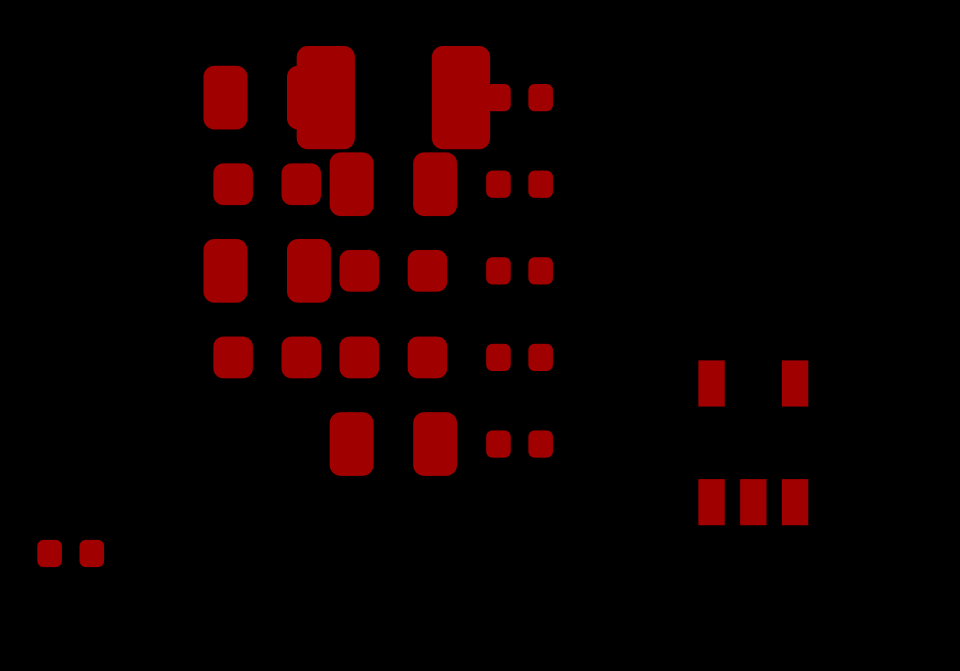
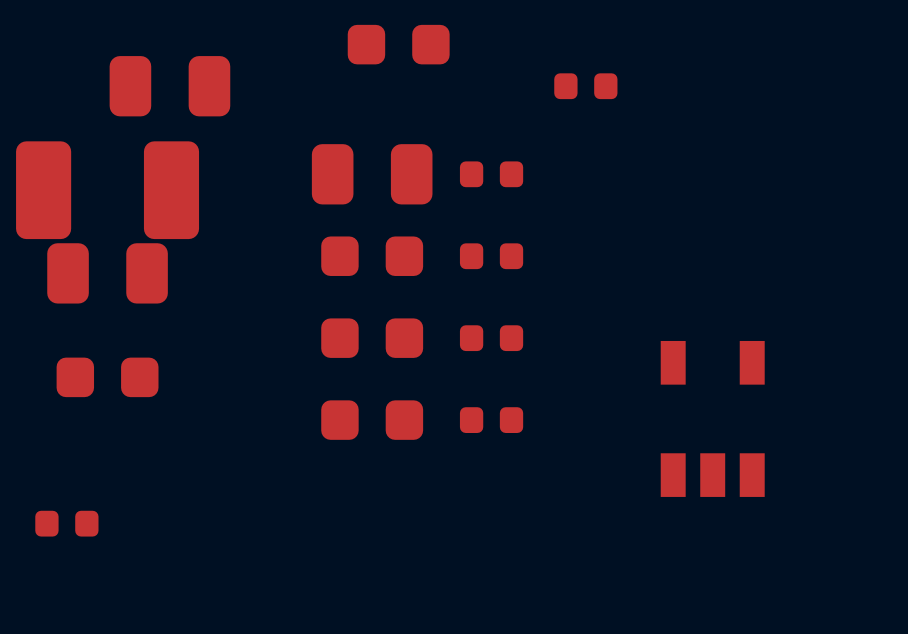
part: none -> (398, 44)
part position: (267, 97) -> (169, 86)
part position: (393, 97) -> (107, 190)
part position: (519, 97) -> (585, 86)
part: (267, 184) -> none
part: (267, 270) -> none
part: none -> (107, 273)
part: (267, 357) -> none
part: none -> (107, 377)
part footprint: [329, 412, 458, 476] -> [321, 400, 424, 440]

